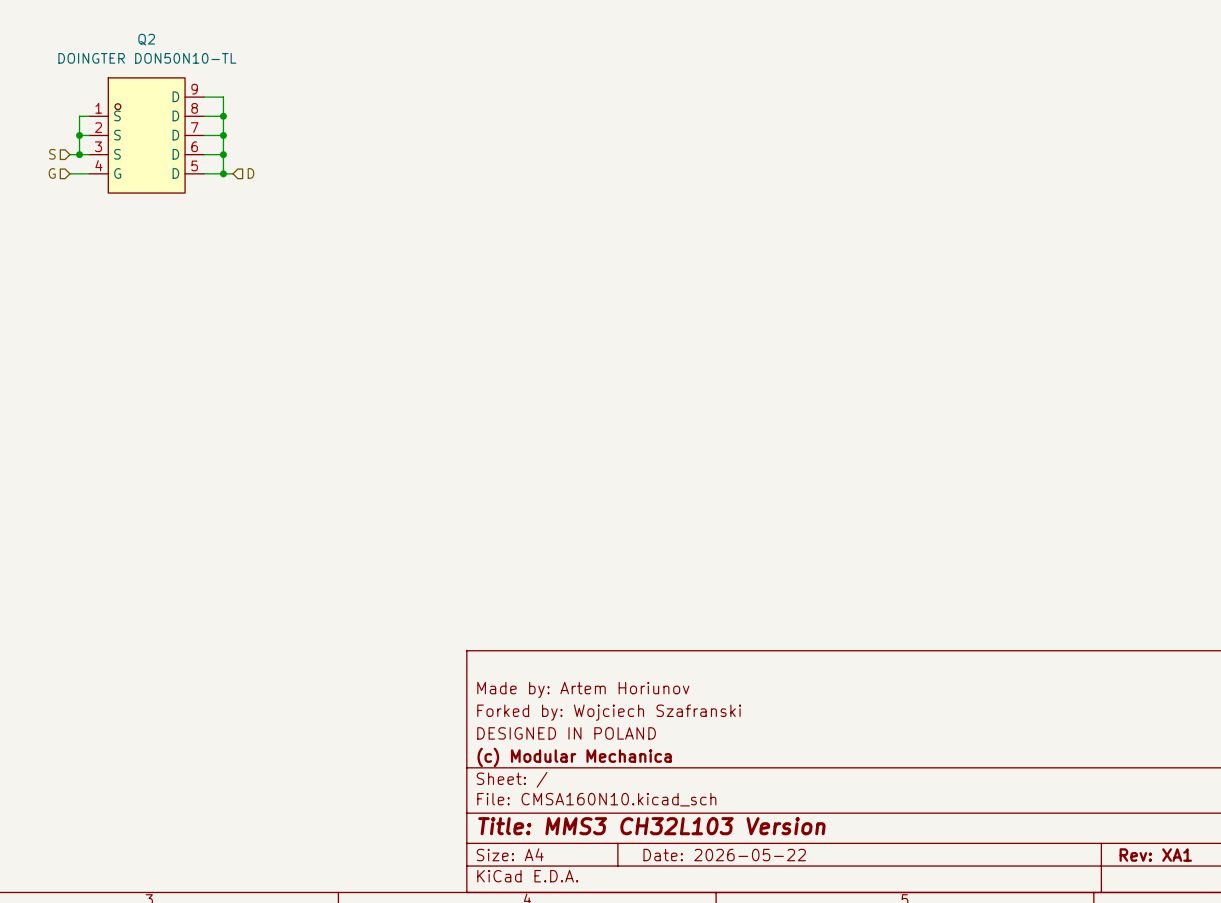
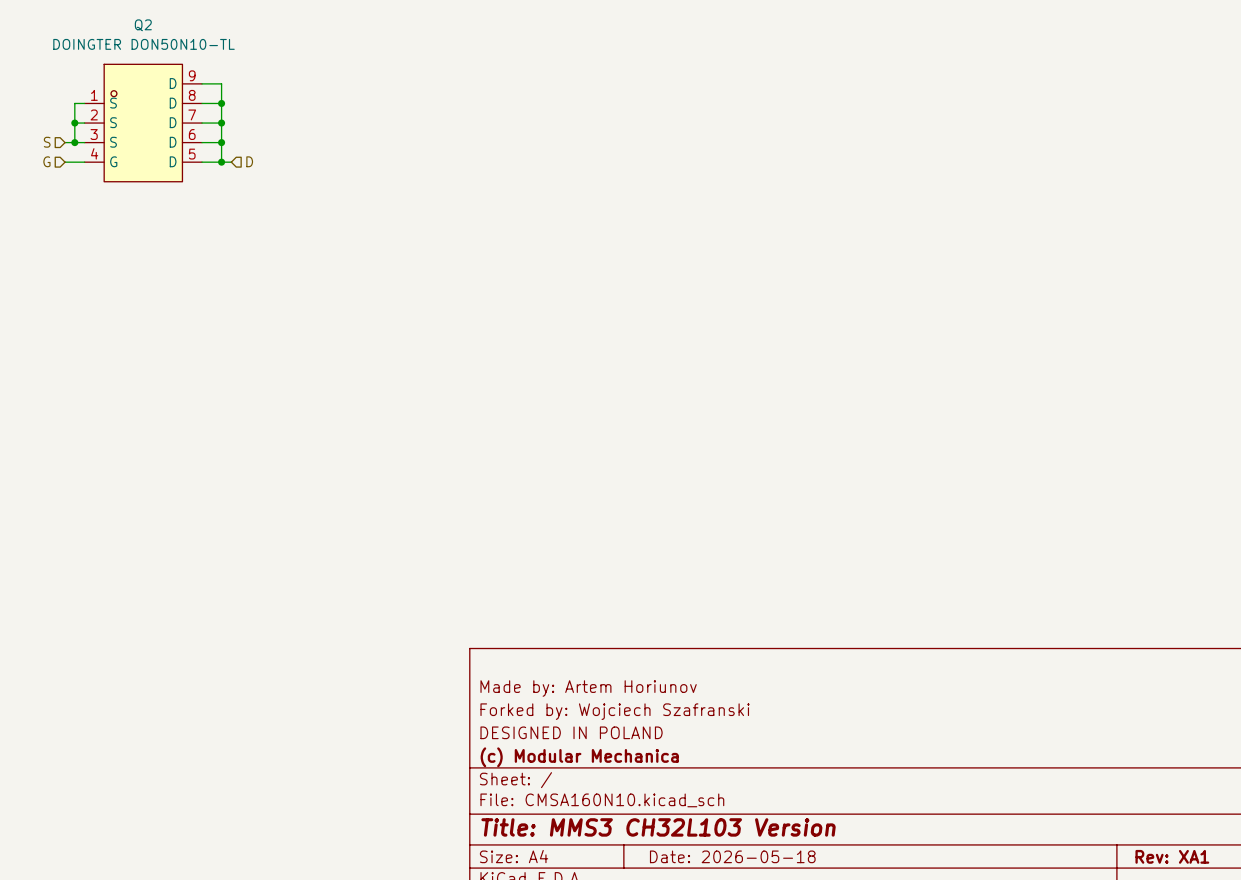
title block: Date: 2026-05-22 (724, 855) -> Date: 2026-05-18 (732, 856)

